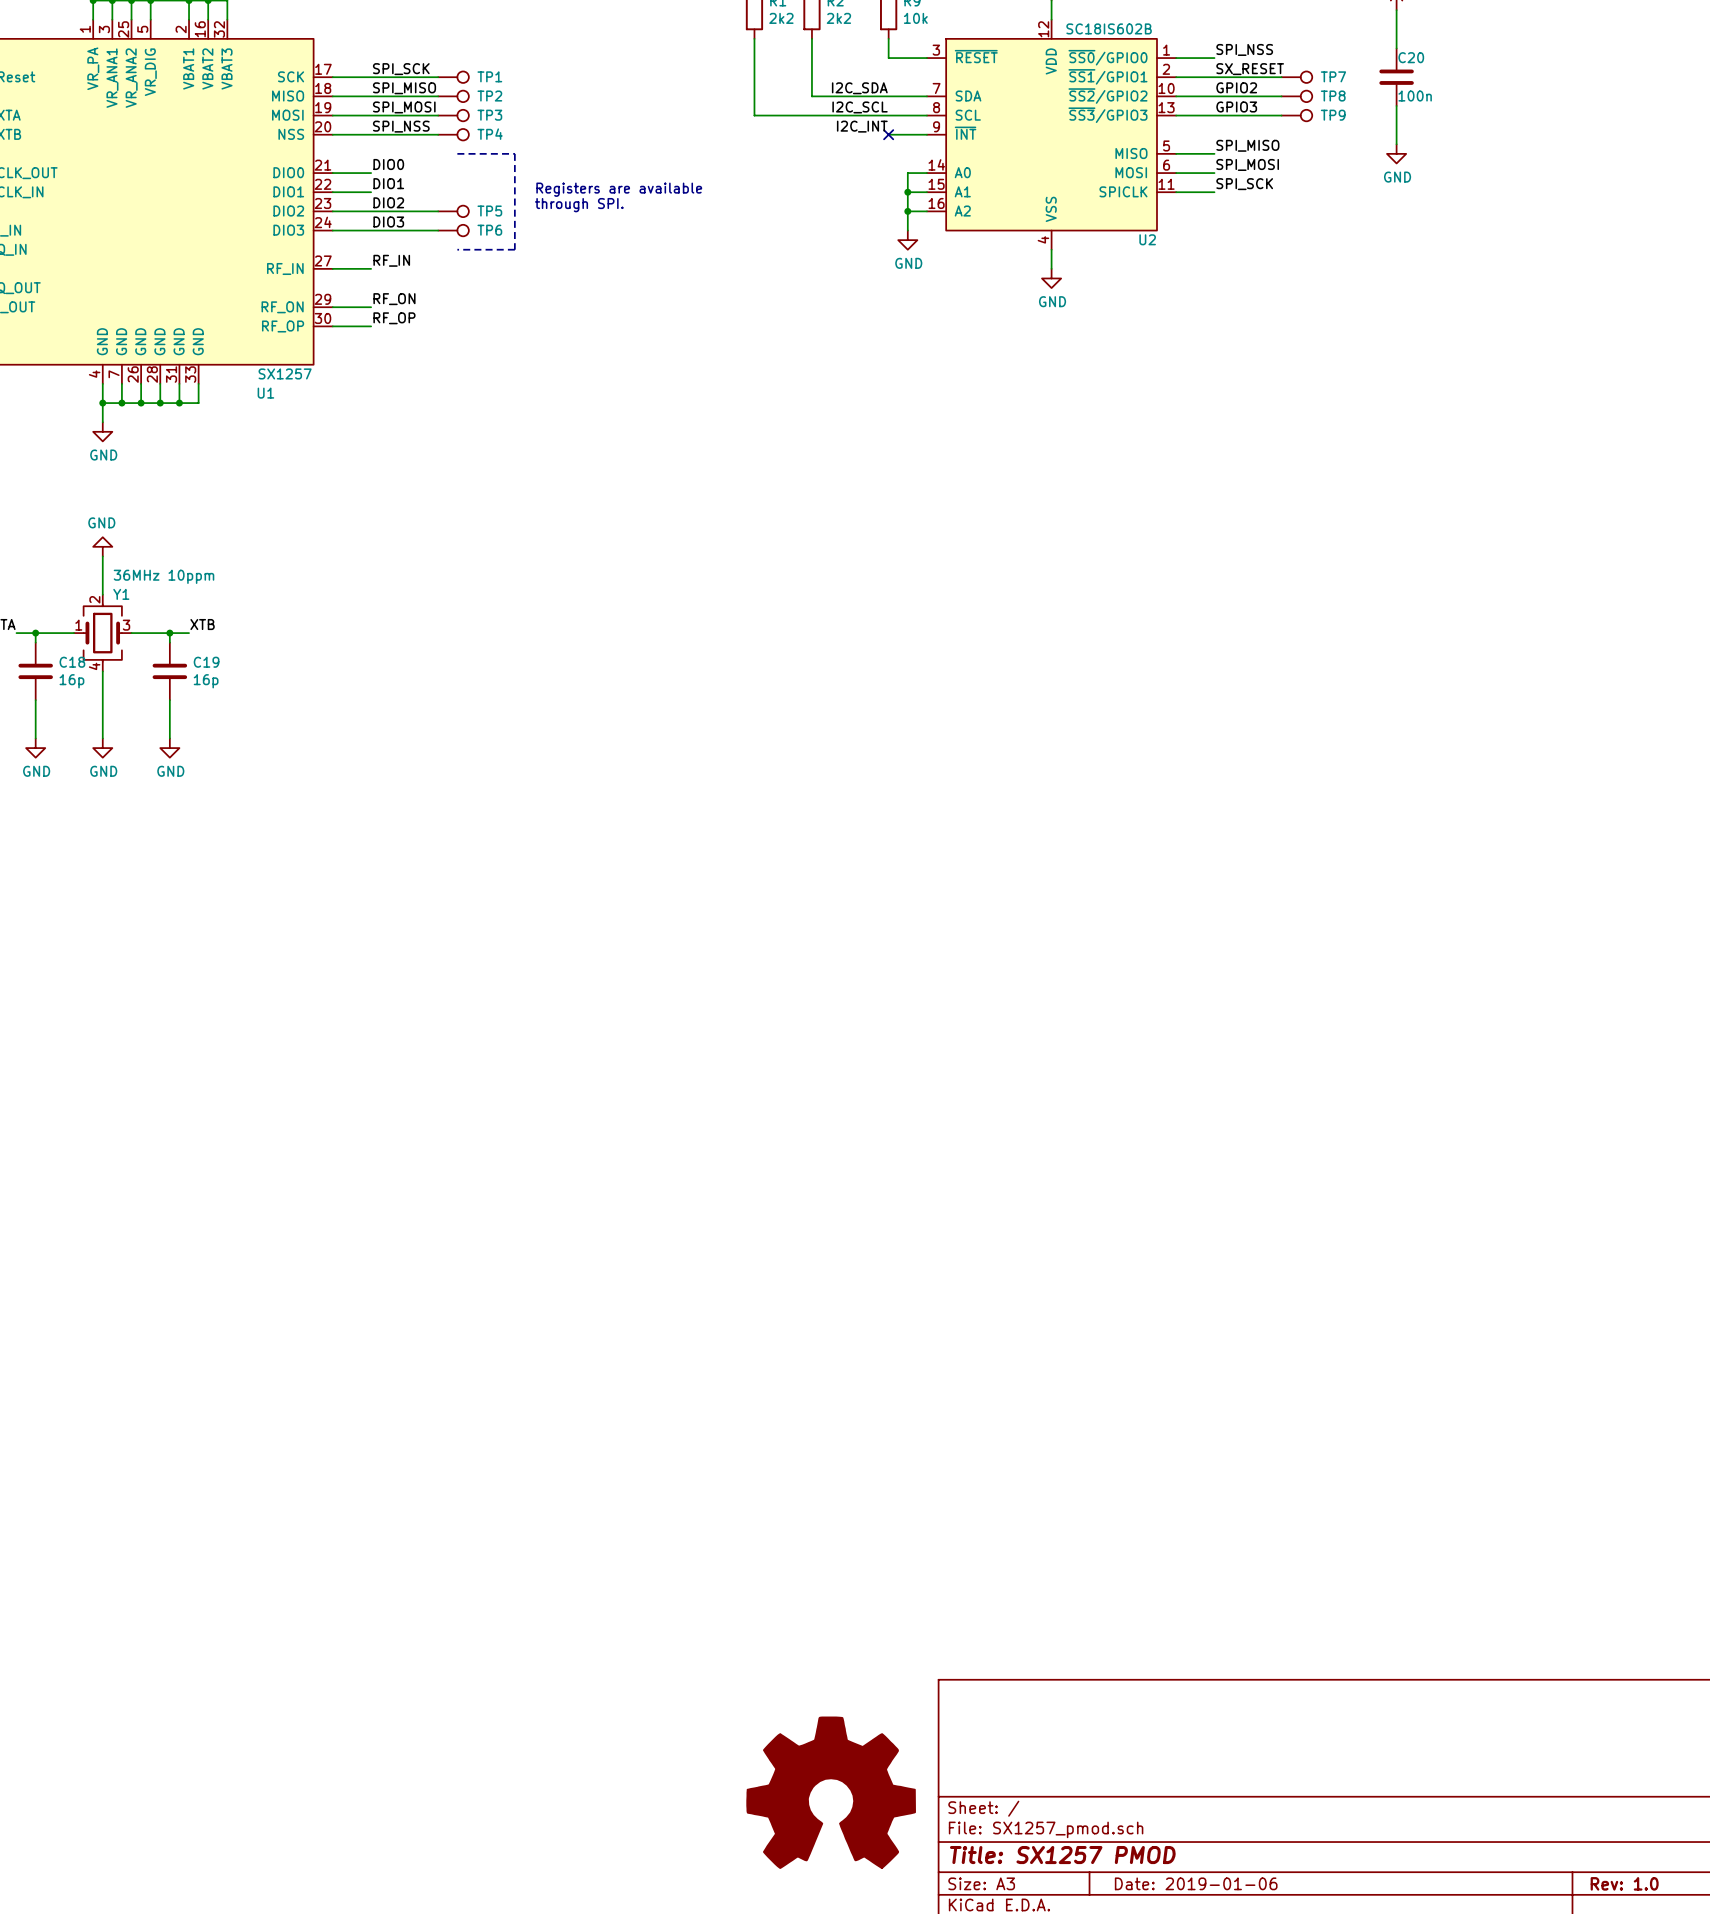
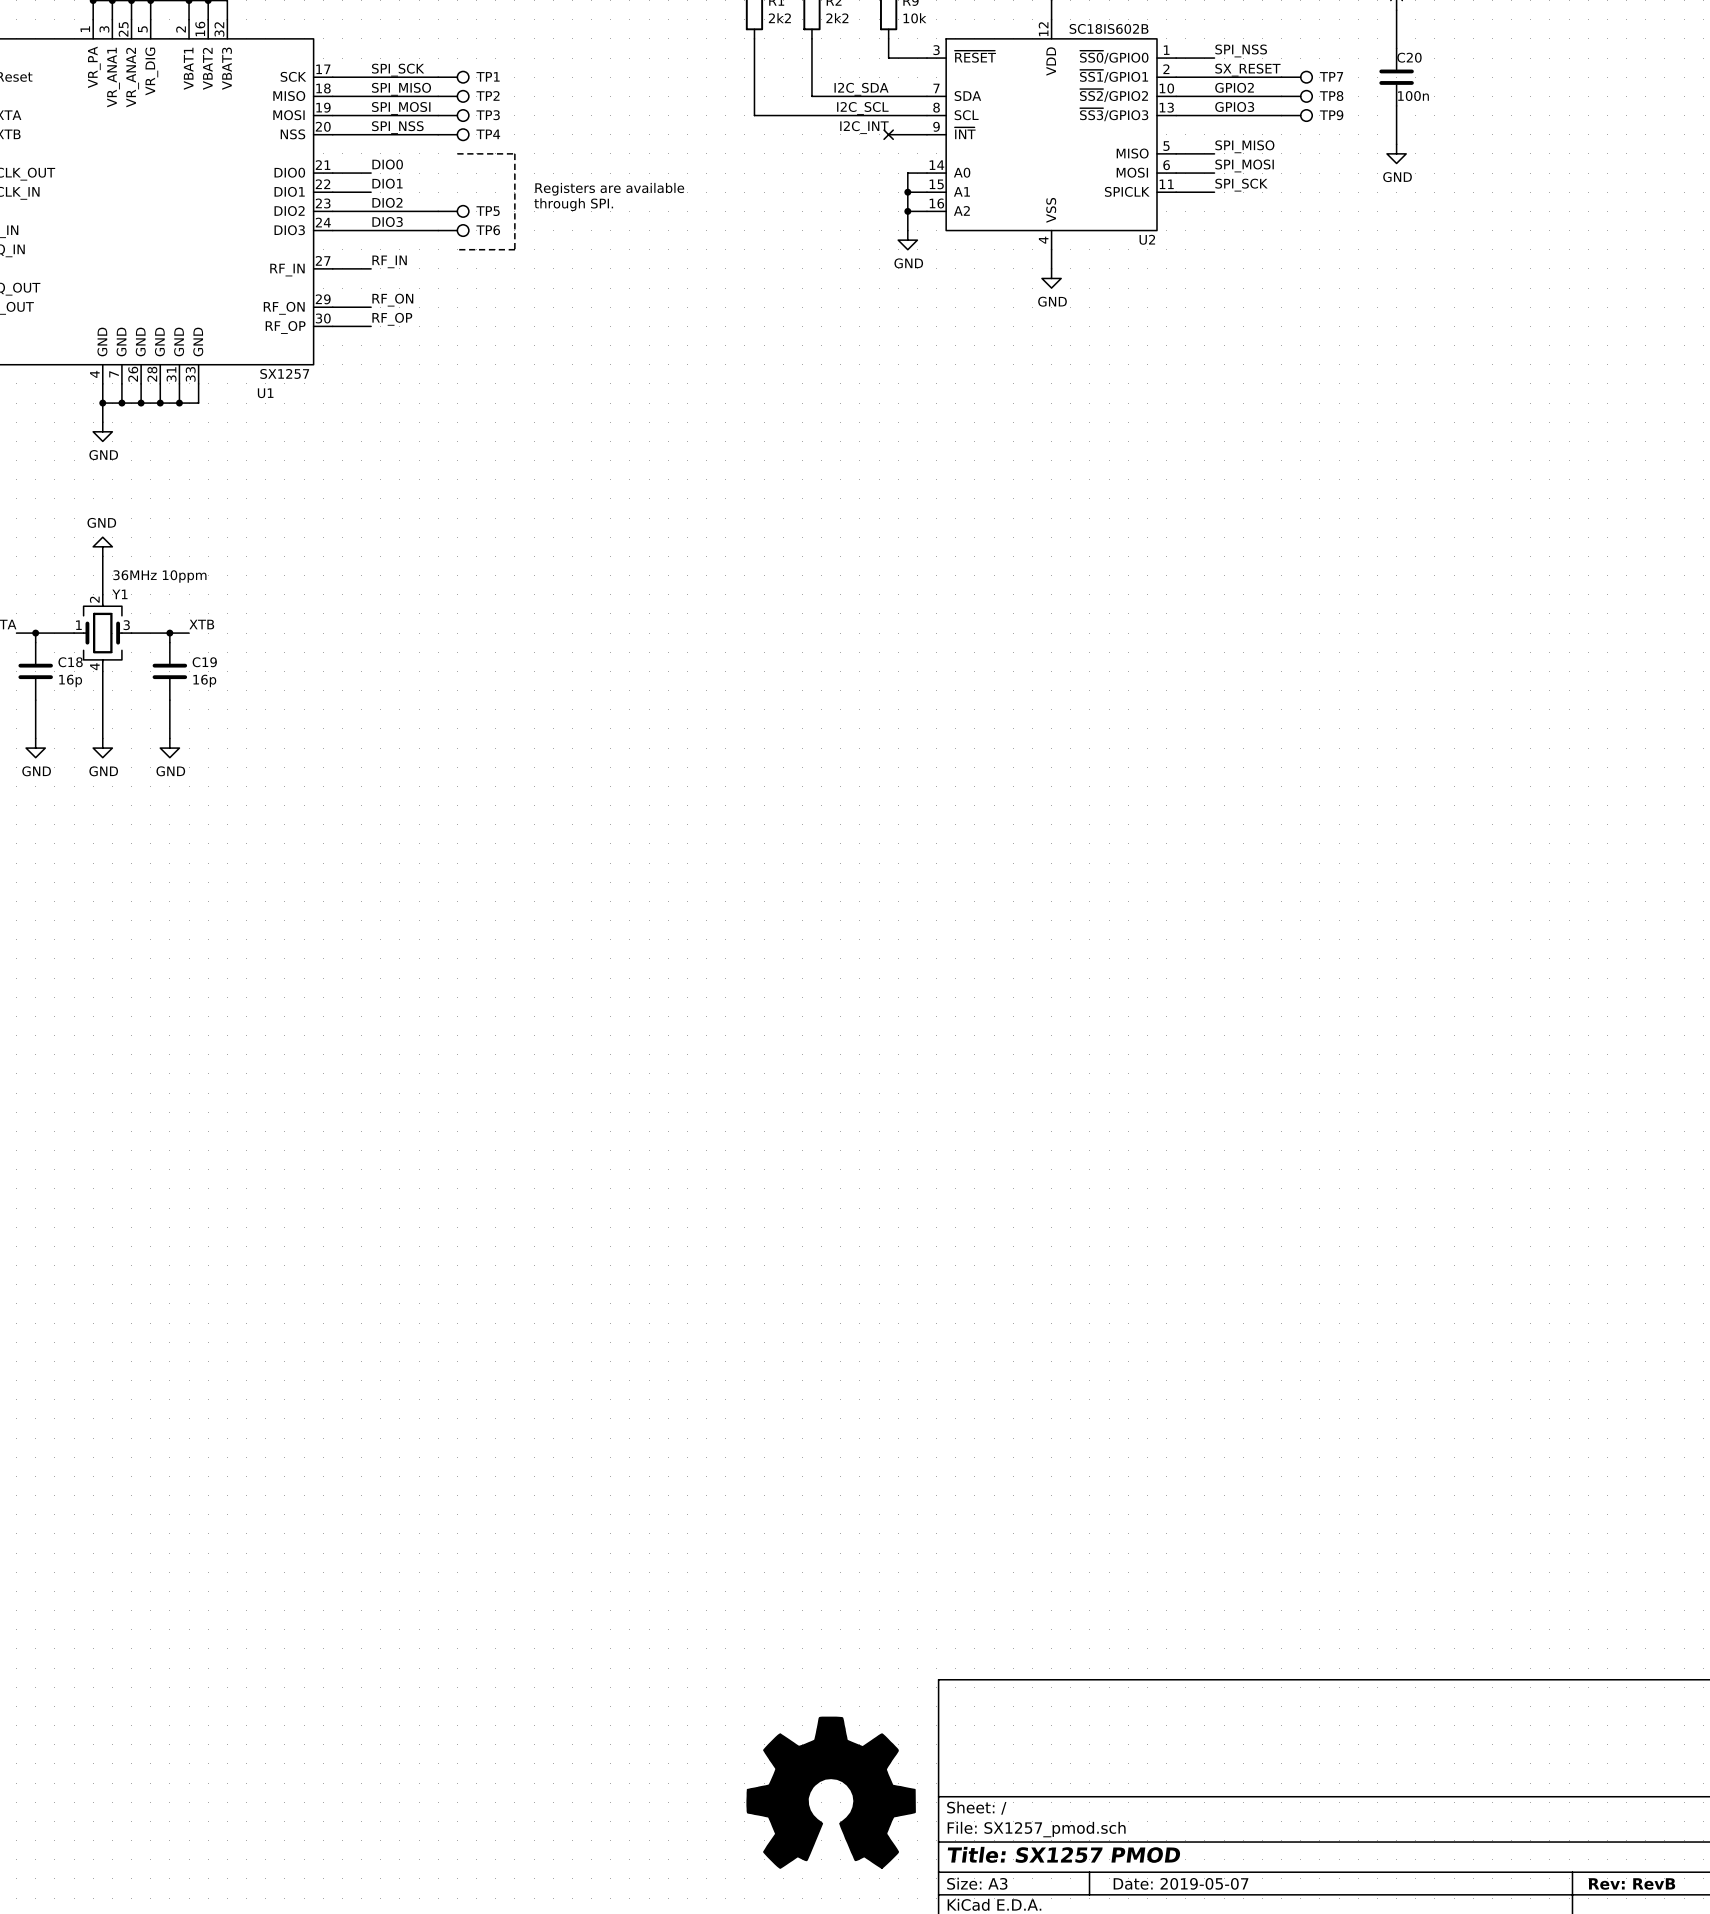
title block: Date: 2019-01-06 (1196, 1883) -> Date: 2019-05-07 (1181, 1883)
title block: Rev: 1.0 (1624, 1883) -> Rev: RevB (1632, 1883)

